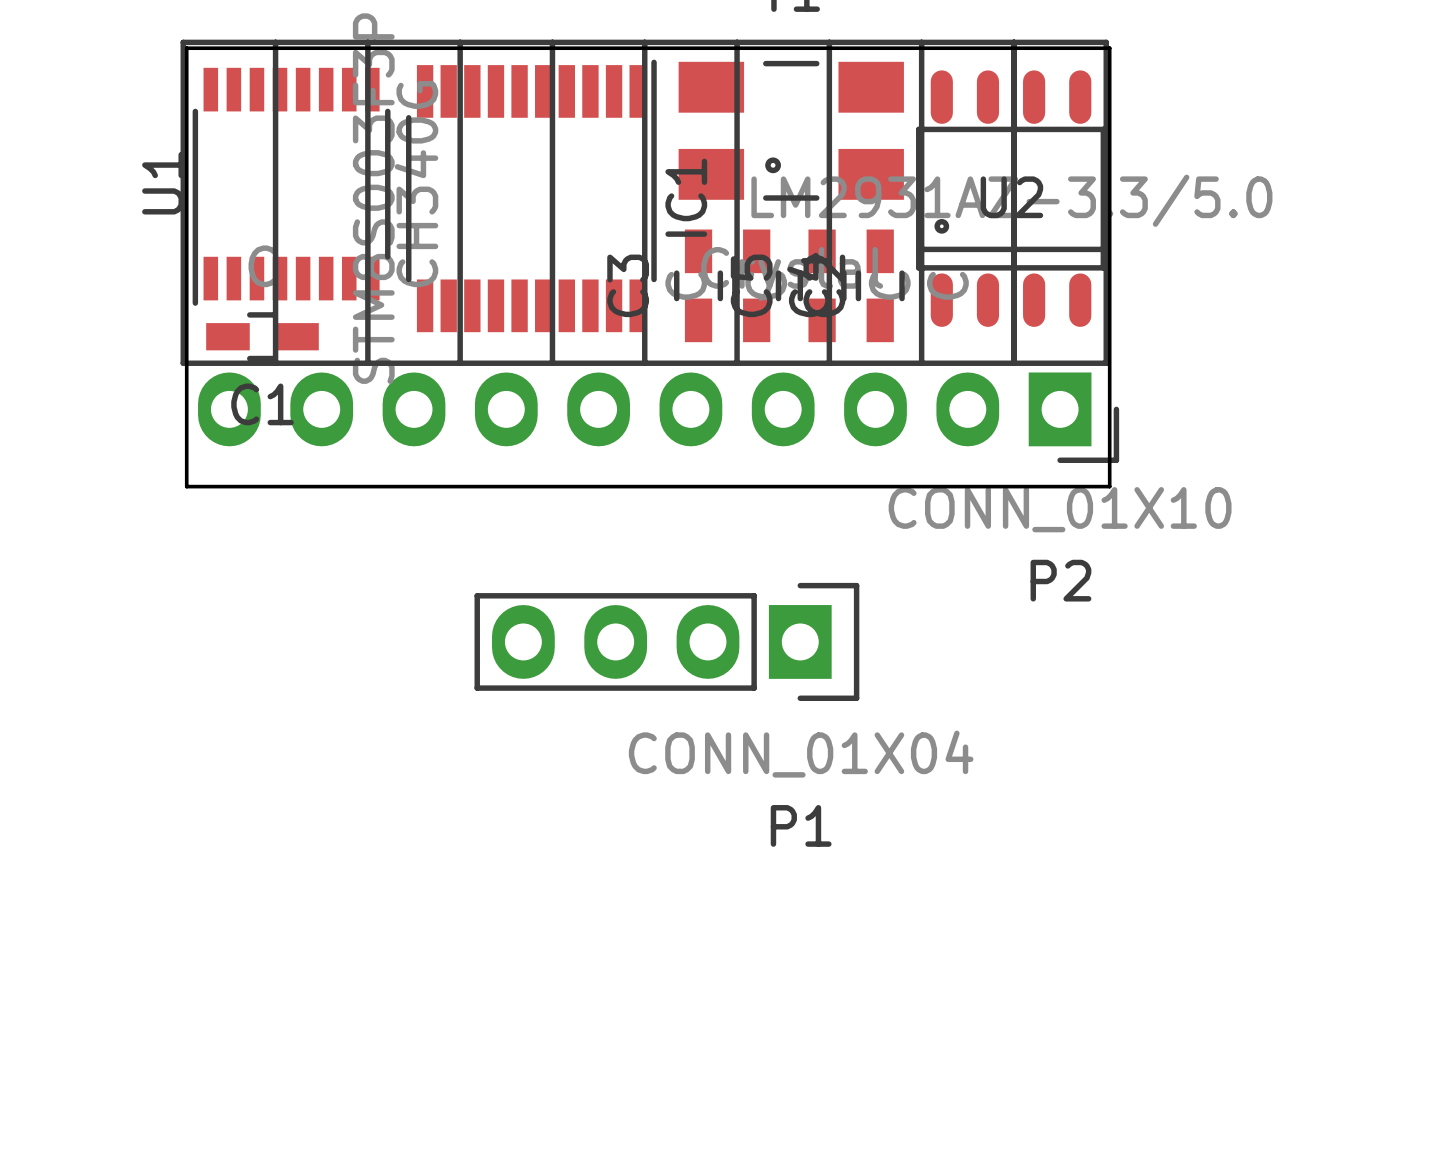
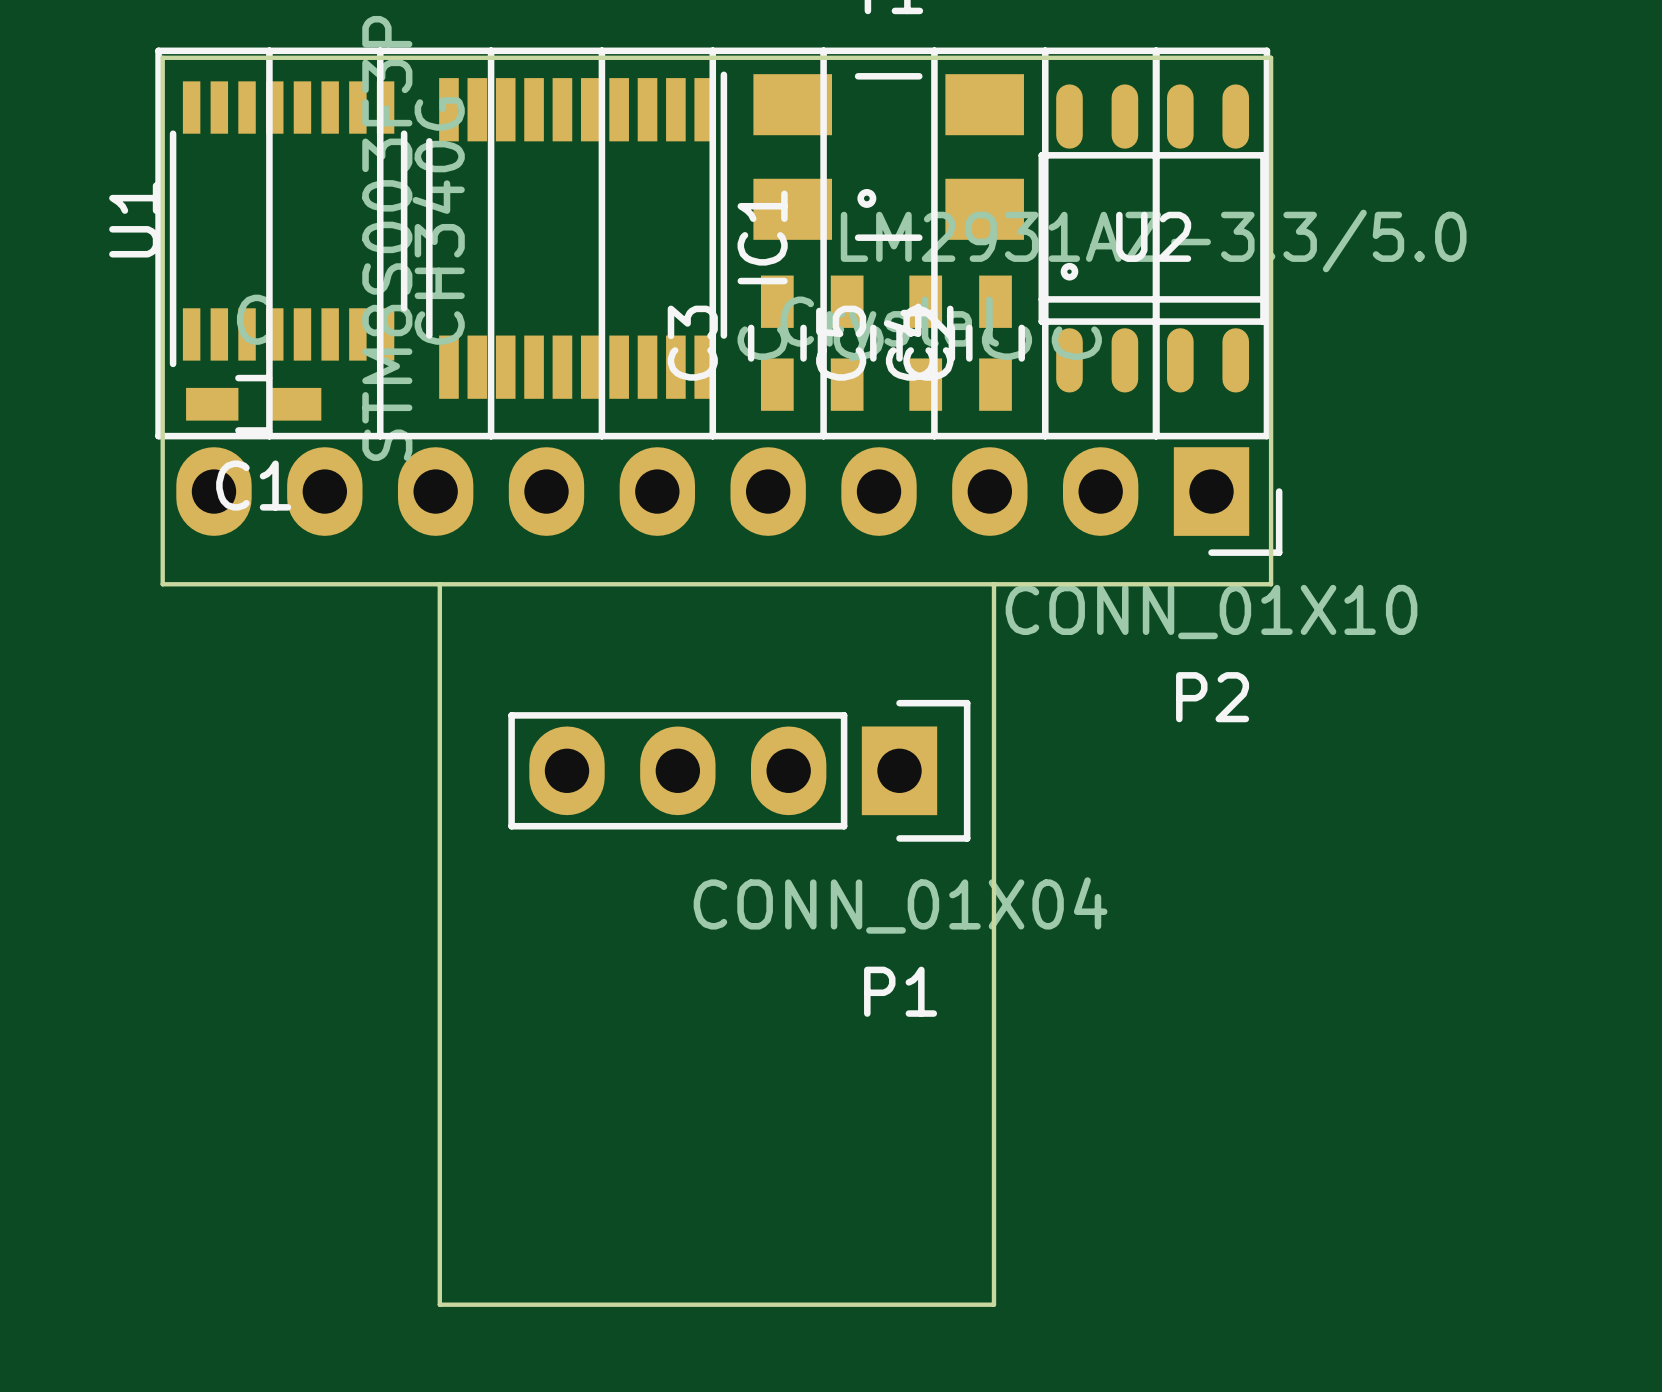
board edge: none -> (439, 584) (439, 1304) (993, 1304) (993, 584)

